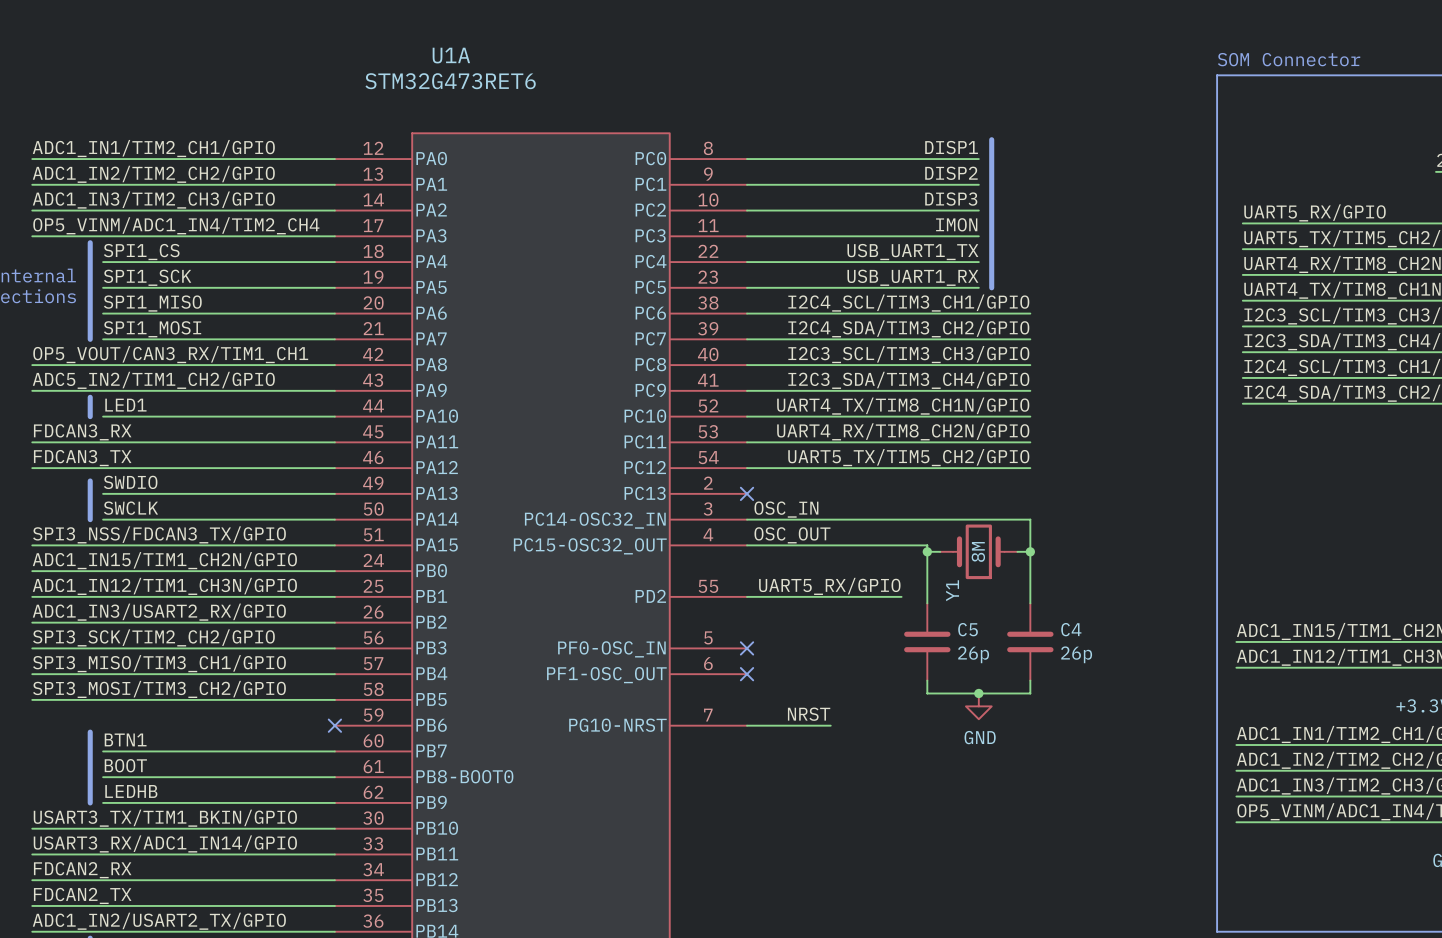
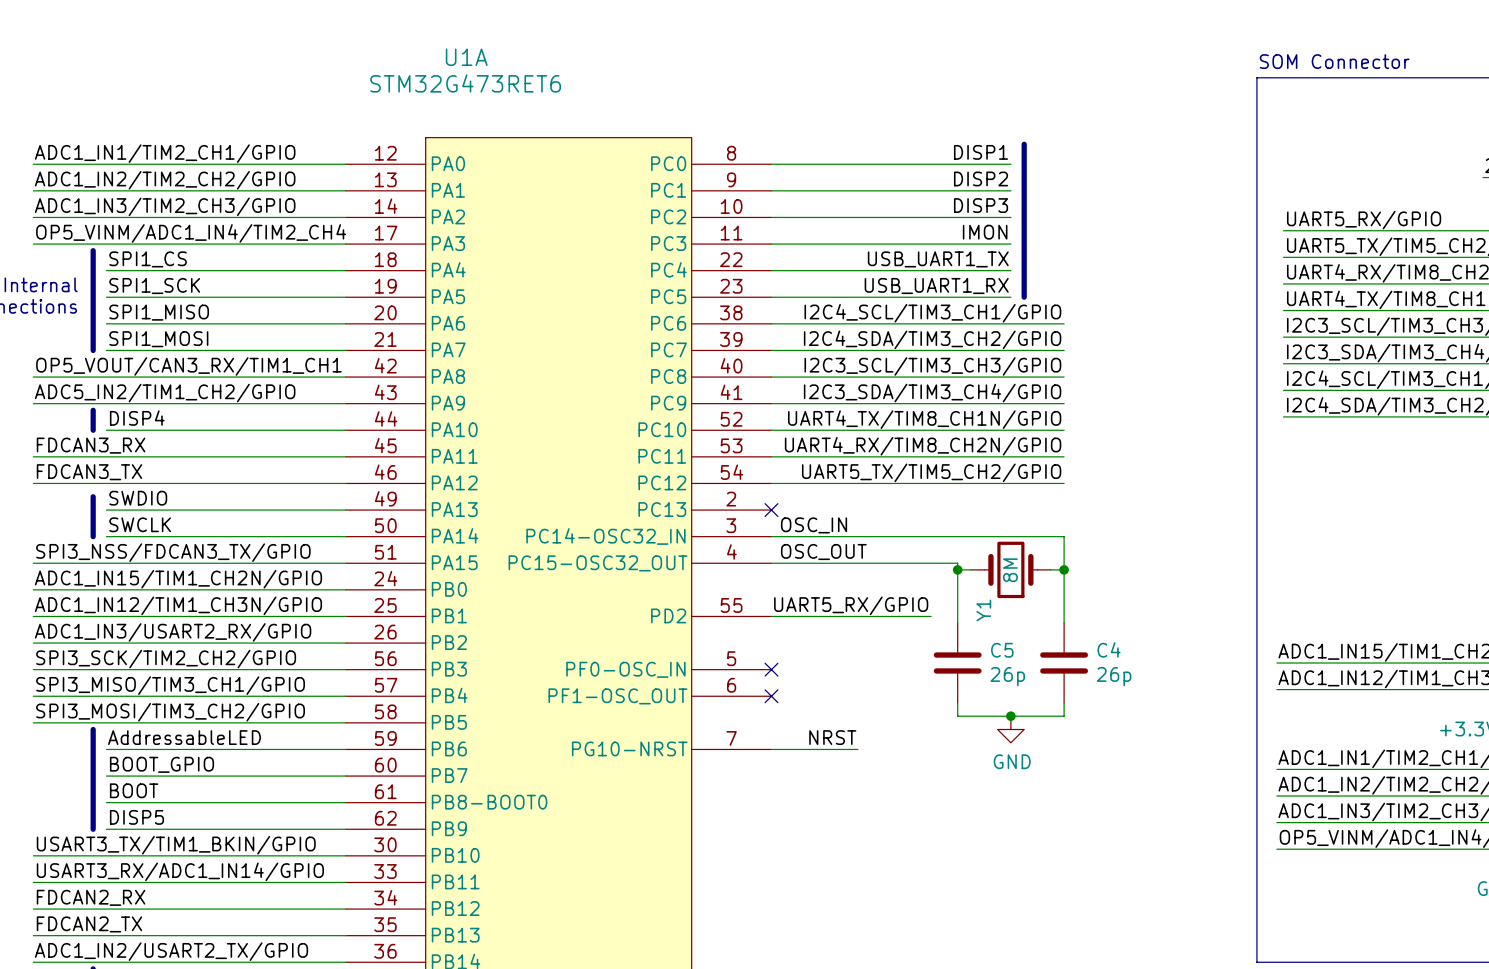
label: LED1 (125, 405) -> DISP4 (137, 418)
line: none -> (93, 729) (93, 756)
label: none -> AddressableLED (184, 737)
wire: none -> (106, 749) (345, 749)
no-connect mark: (334, 725) -> none
label: BTN1 (125, 739) -> BOOT_GPIO (161, 764)
label: LEDHB (131, 791) -> DISP5 (136, 817)

